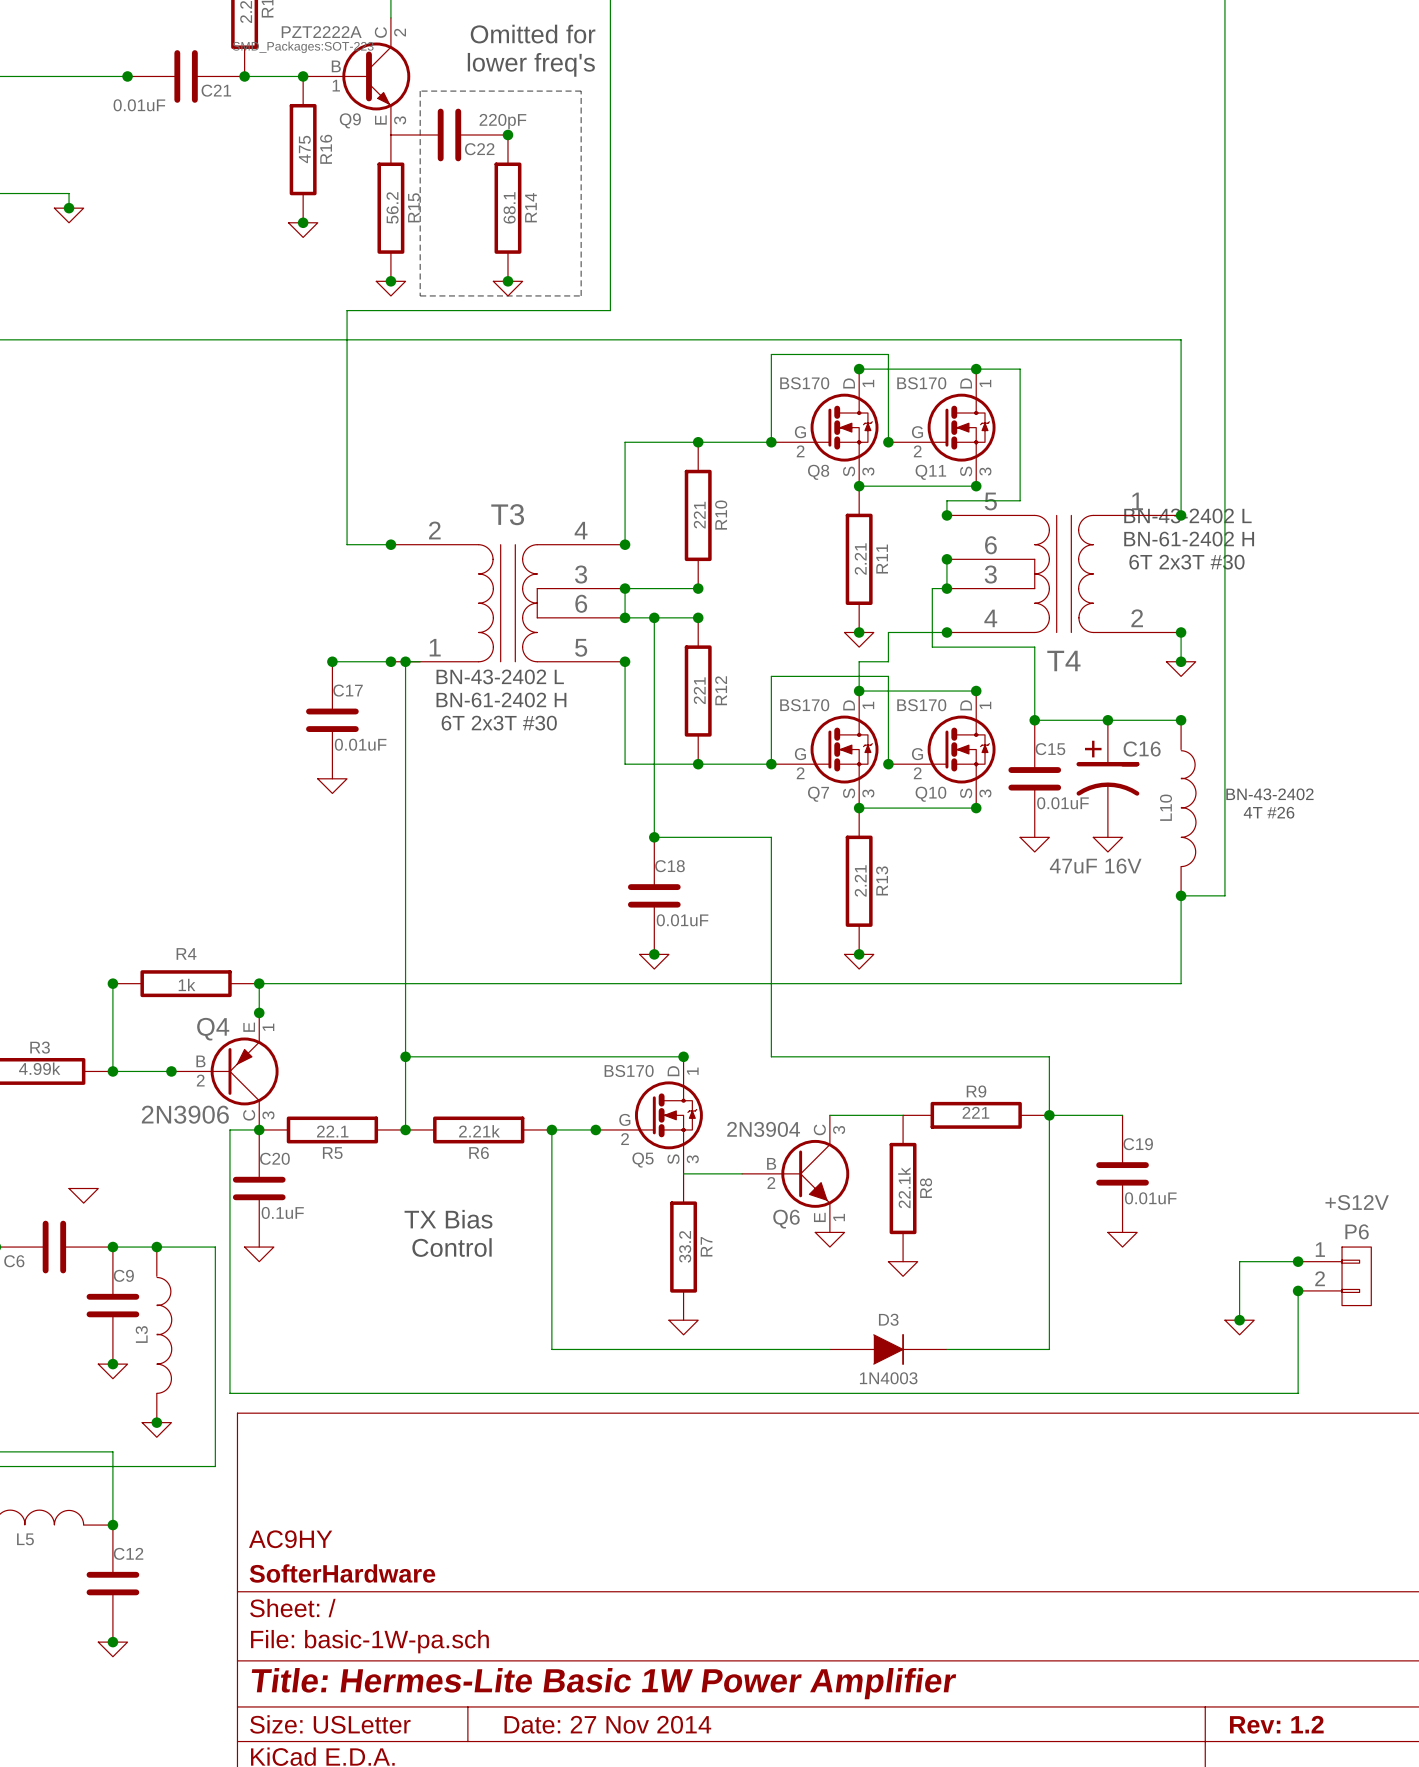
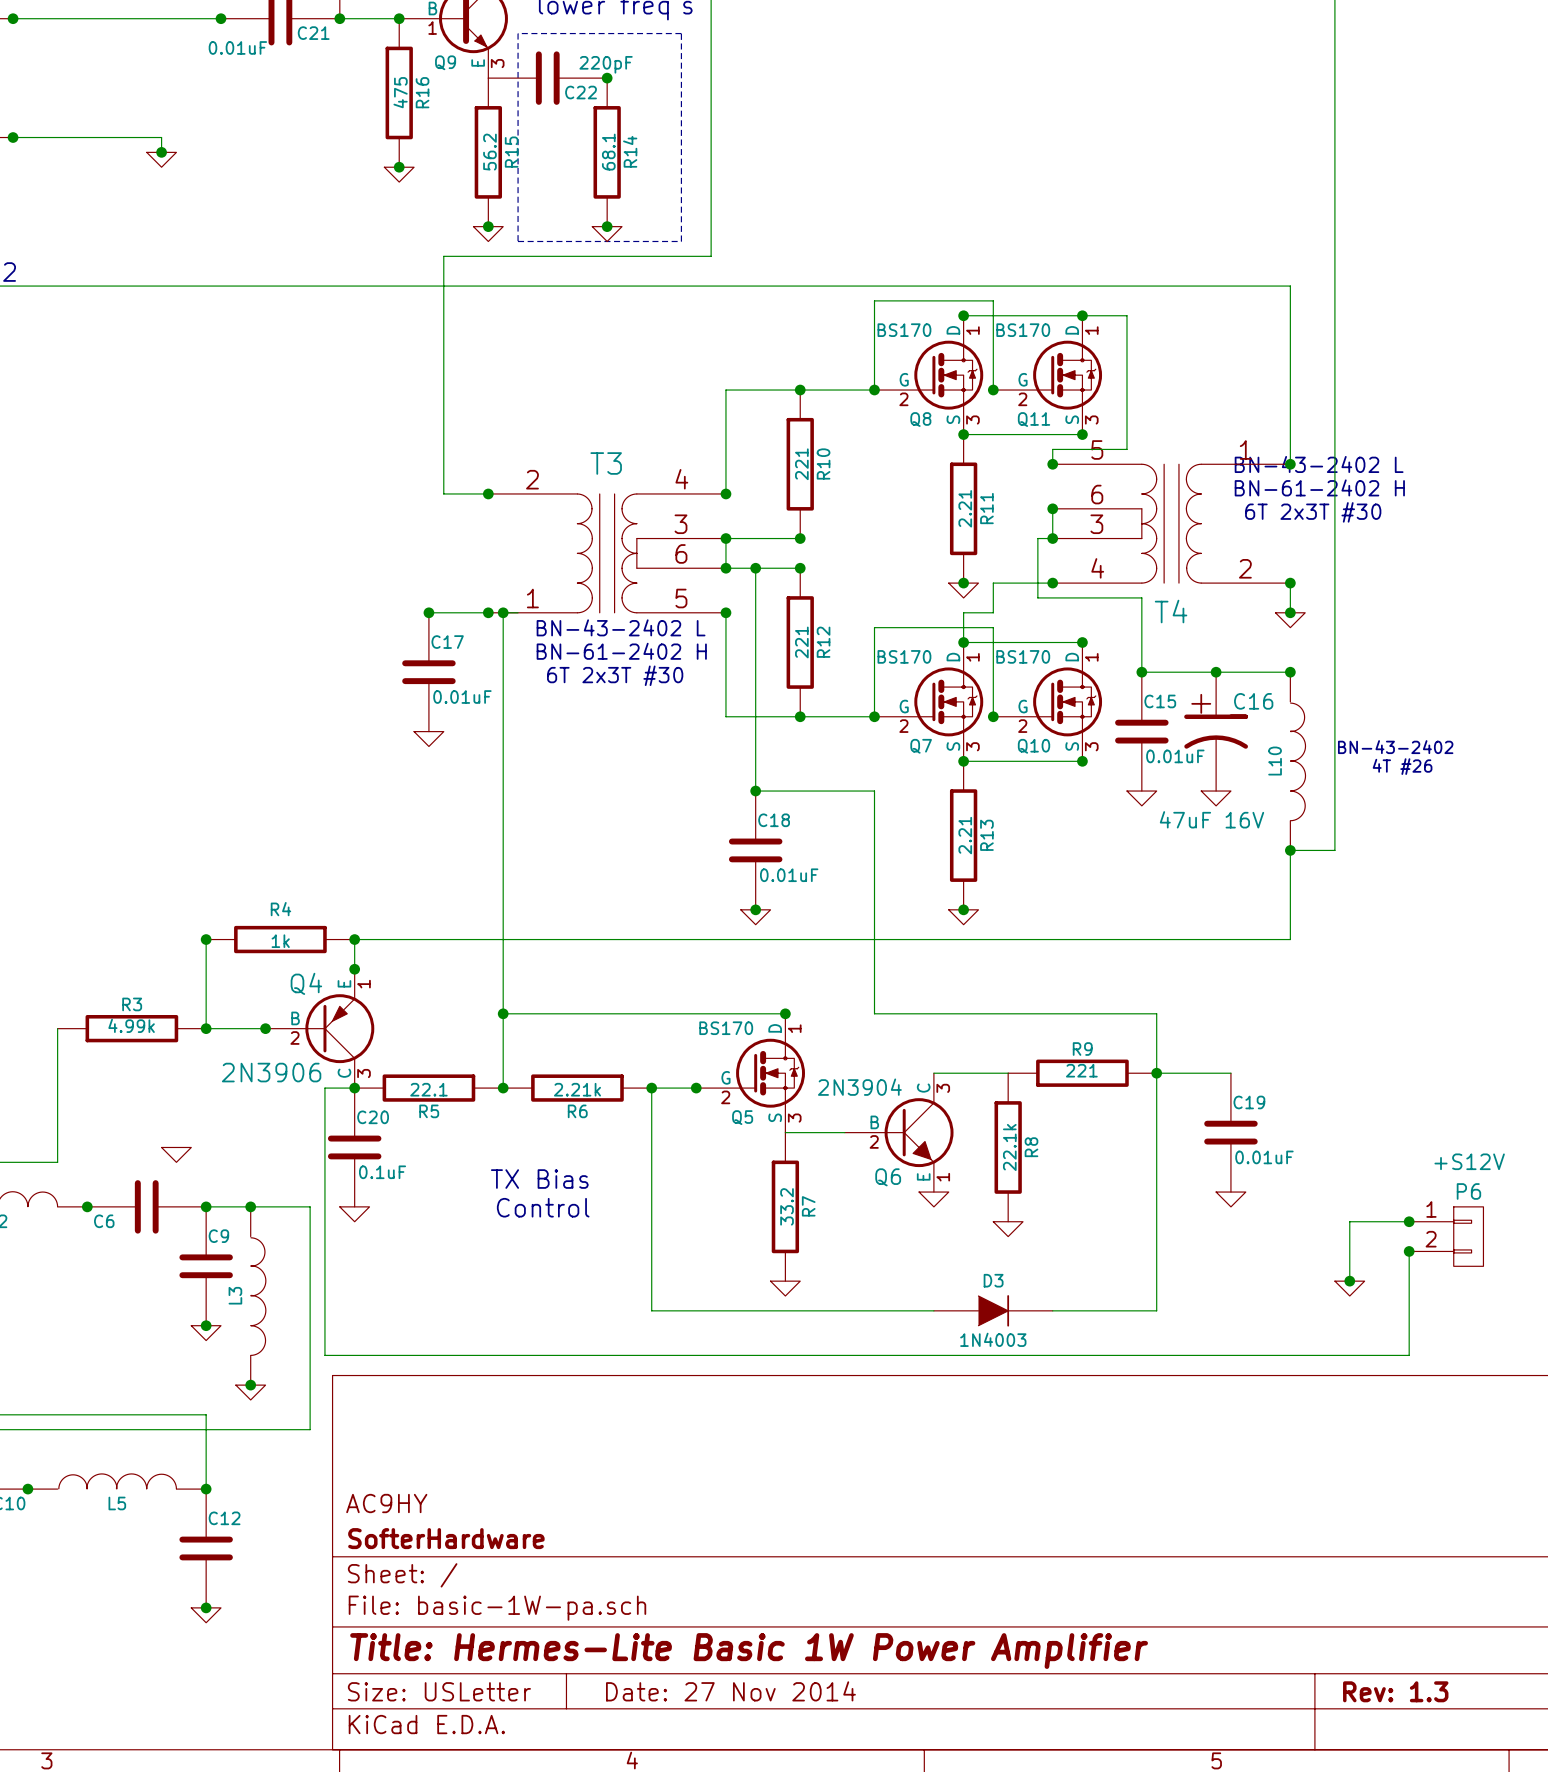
title block: Rev: 1.2 (1276, 1724) -> Rev: 1.3 (1395, 1691)

